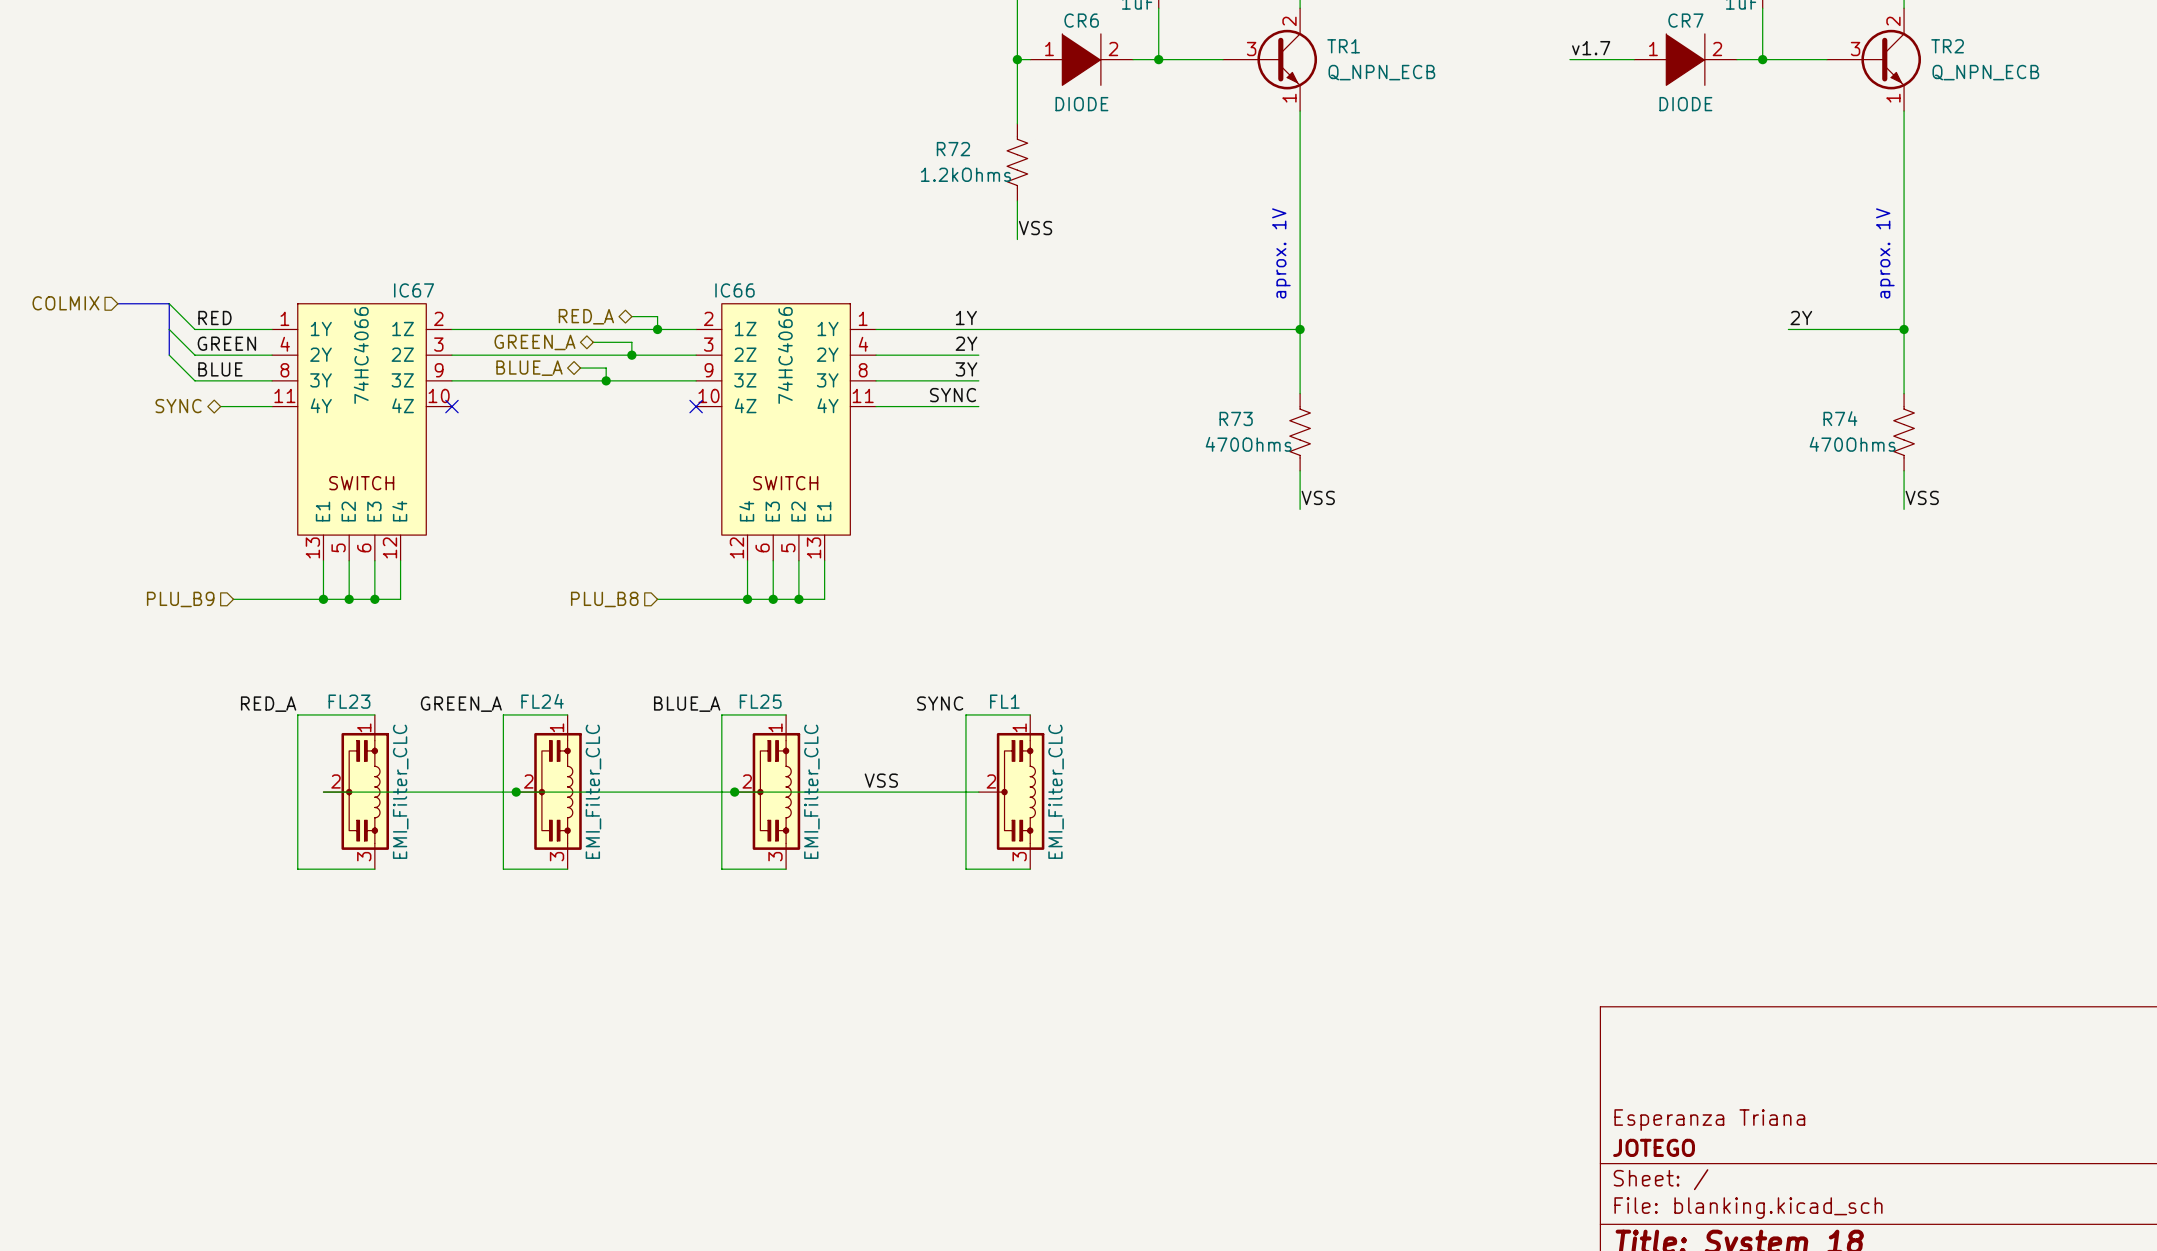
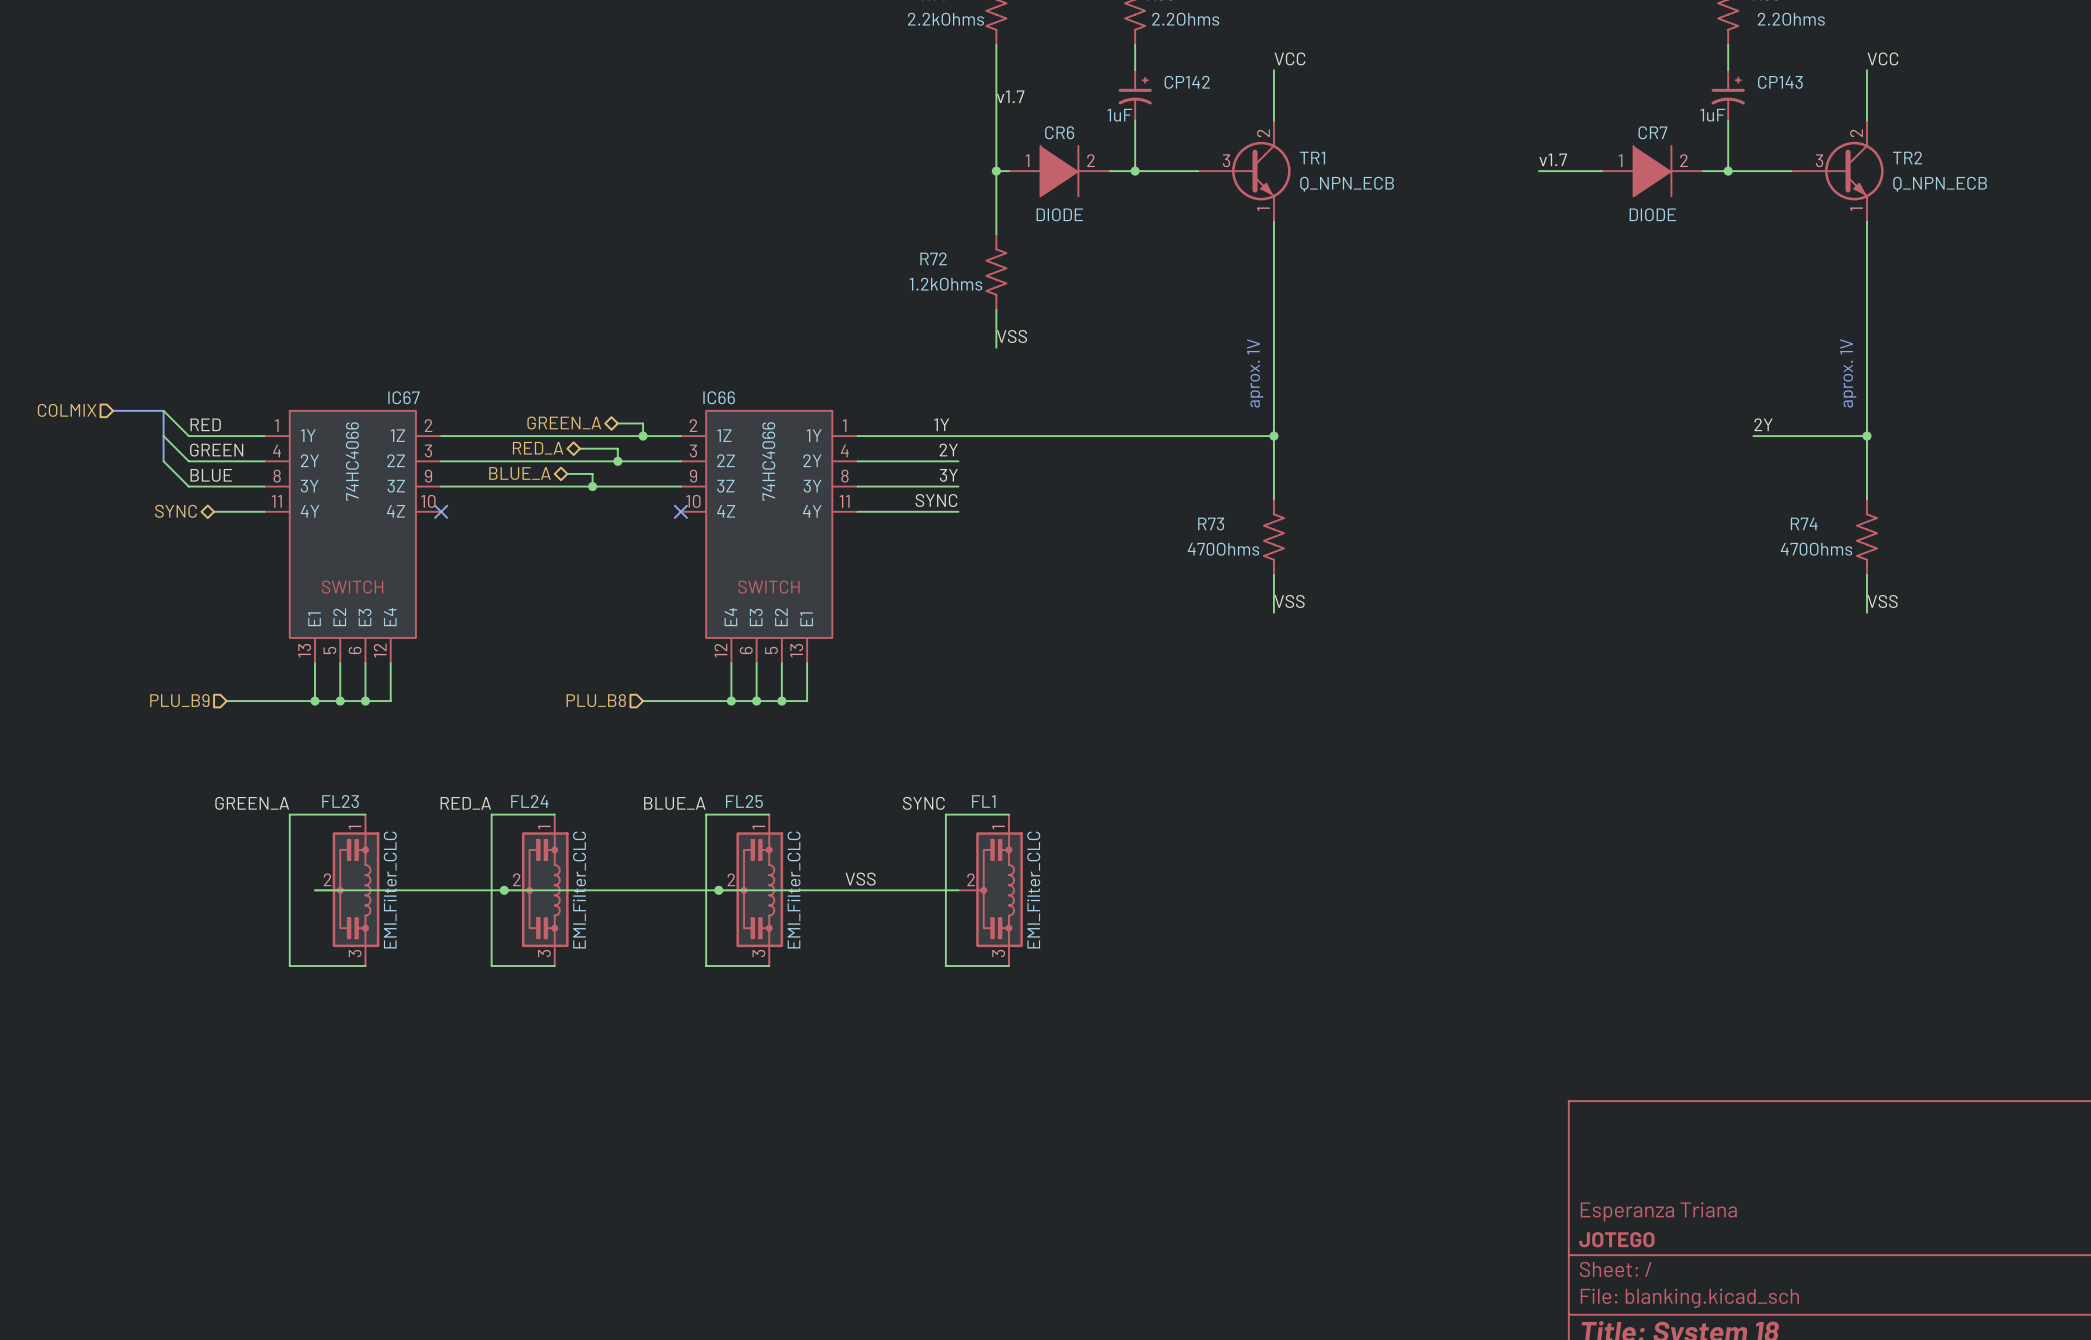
hierarchical label: RED_A (586, 316) -> GREEN_A (564, 422)
hierarchical label: GREEN_A (534, 342) -> RED_A (538, 448)
label: RED_A (268, 704) -> GREEN_A (252, 803)
label: GREEN_A (461, 704) -> RED_A (465, 803)

